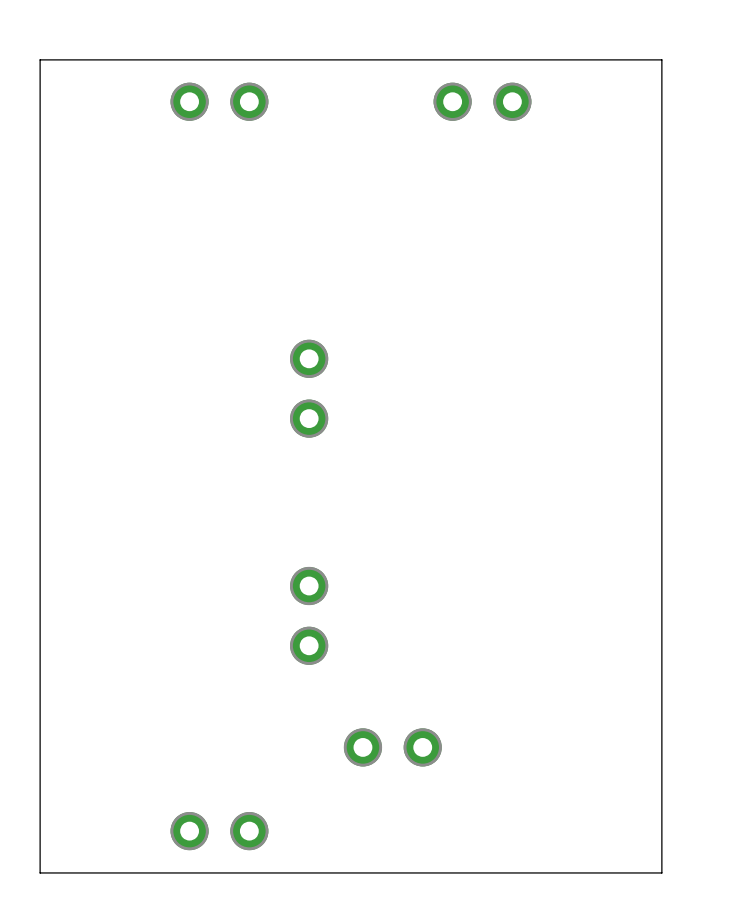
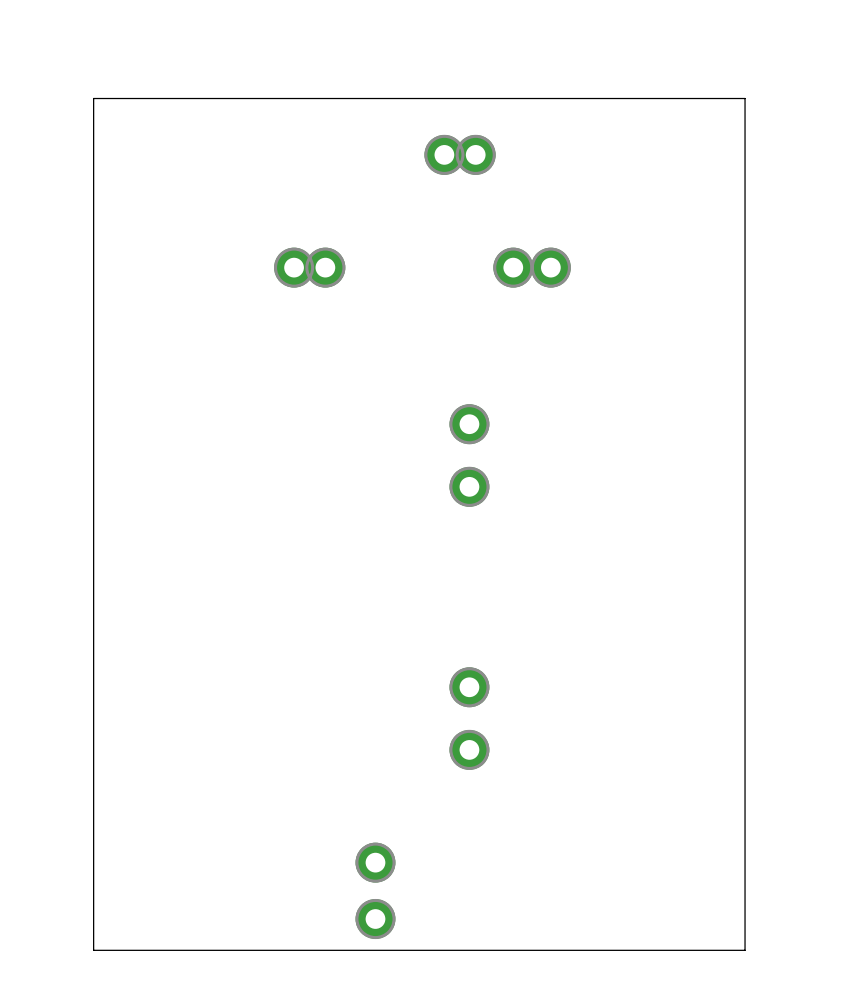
part: (189, 101) -> none
part: (249, 101) -> none
part: (452, 101) -> none
part: (512, 101) -> none
part: none -> (444, 154)
part: none -> (475, 154)
part: none -> (294, 267)
part: none -> (325, 267)
part: none -> (513, 267)
part: none -> (550, 267)
part: (309, 358) -> none
part: none -> (469, 424)
part: (309, 418) -> none
part: none -> (469, 486)
part: (309, 586) -> none
part: none -> (469, 687)
part: (309, 645) -> none
part: none -> (469, 749)
part: (362, 747) -> none
part: (422, 747) -> none
part: none -> (375, 862)
part: (189, 831) -> none
part: (249, 831) -> none
part: none -> (375, 919)

